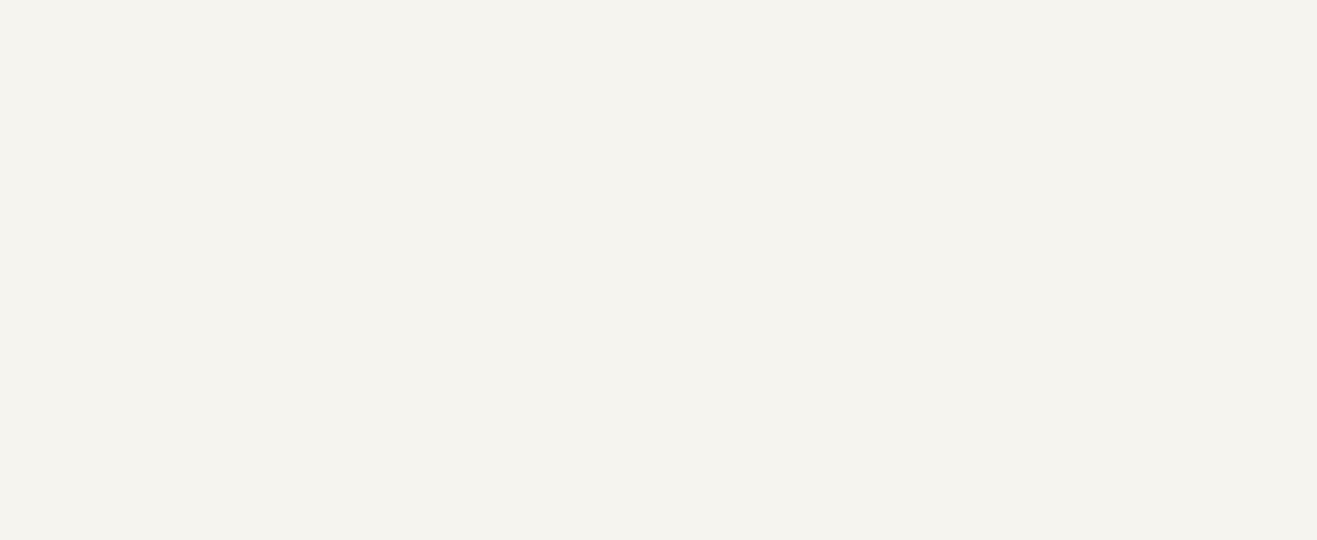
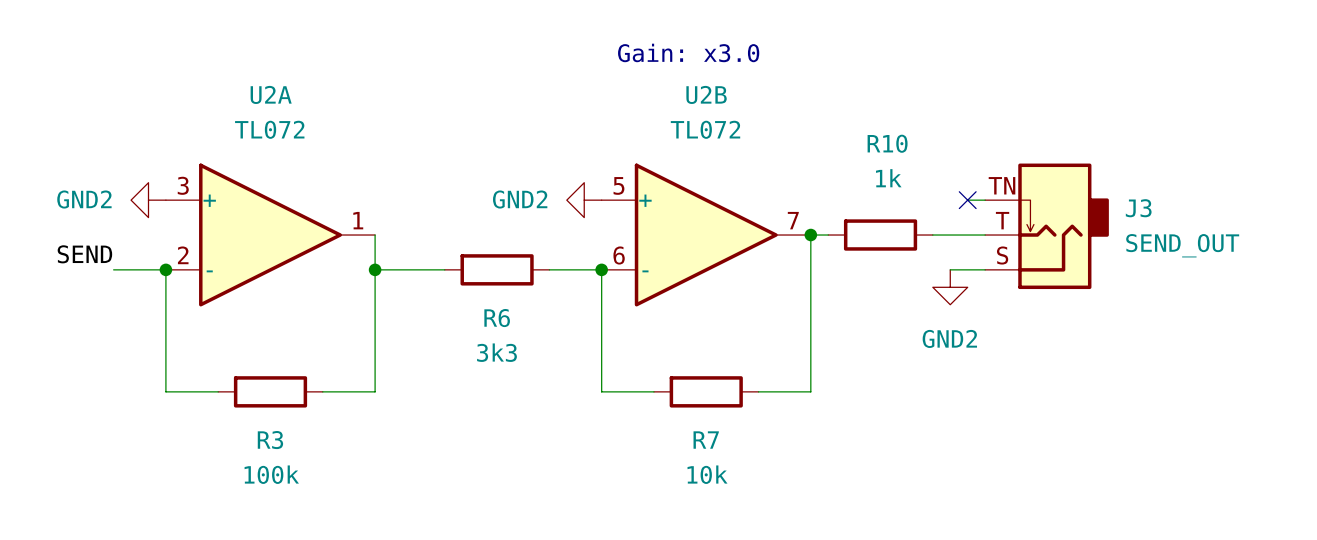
text: none -> Gain: x3.0 (688, 52)
power symbol: none -> GND2 (148, 200)
power symbol: none -> GND2 (584, 200)
wire: none -> (967, 200) (985, 200)
no-connect mark: none -> (967, 200)
J3: none -> SEND_OUT (1047, 226)
U2A: none -> TL072 (270, 235)
wire: none -> (375, 235) (375, 391) (322, 391)
U2B: none -> TL072 (706, 235)
junction: none -> (810, 235)
wire: none -> (828, 235) (810, 235) (810, 391) (758, 391)
R10: none -> 1k (880, 235)
wire: none -> (932, 235) (985, 235)
label: none -> SEND (84, 254)
wire: none -> (113, 269) (165, 269) (165, 391) (218, 391)
junction: none -> (165, 269)
wire: none -> (375, 269) (444, 269)
junction: none -> (375, 269)
R6: none -> 3k3 (497, 269)
wire: none -> (549, 269) (601, 269) (601, 391) (653, 391)
junction: none -> (601, 269)
wire: none -> (950, 269) (985, 269)
power symbol: none -> GND2 (950, 287)
R3: none -> 100k (270, 391)
R7: none -> 10k (706, 391)

